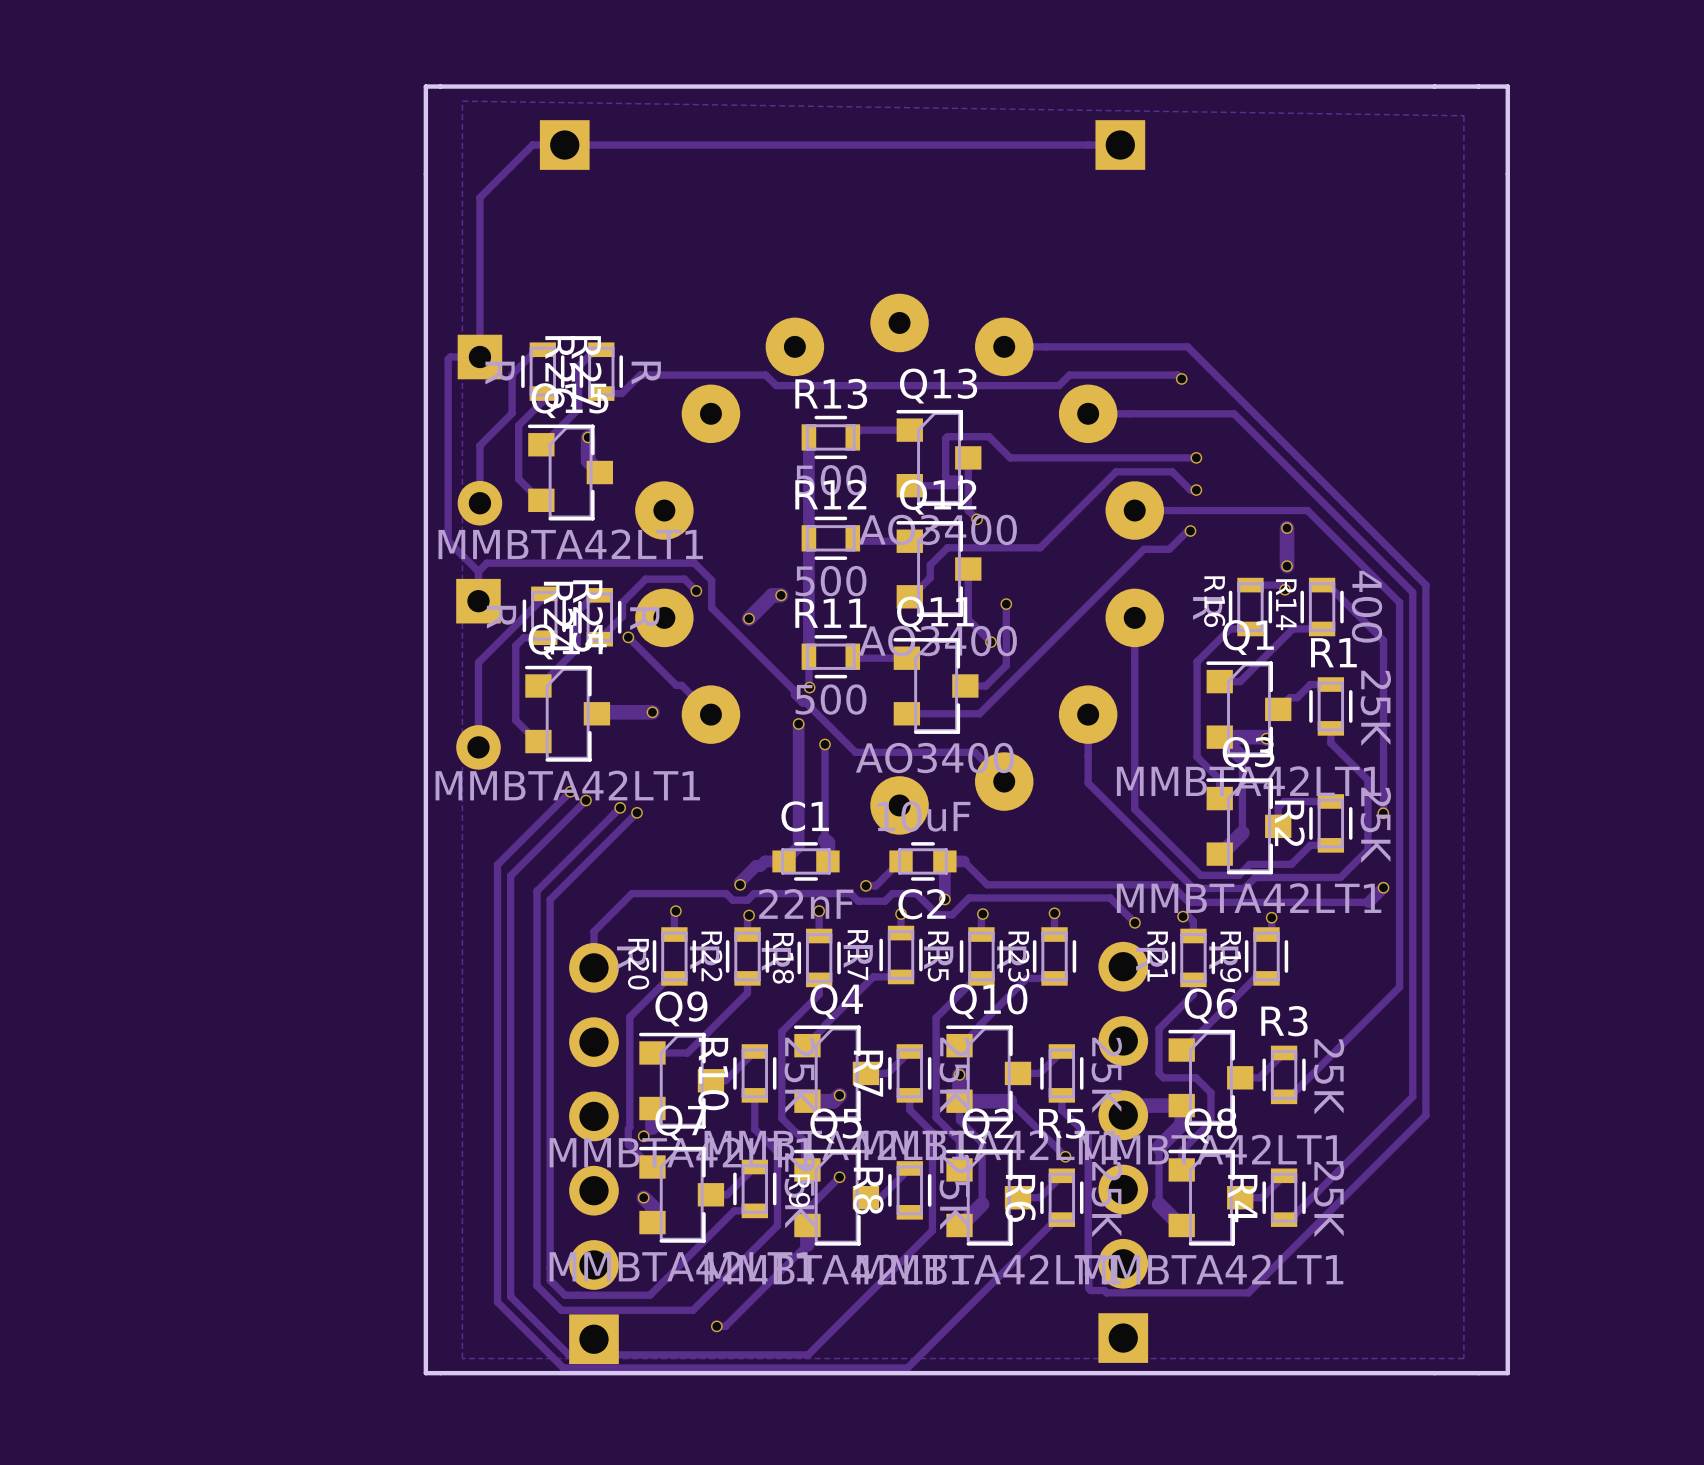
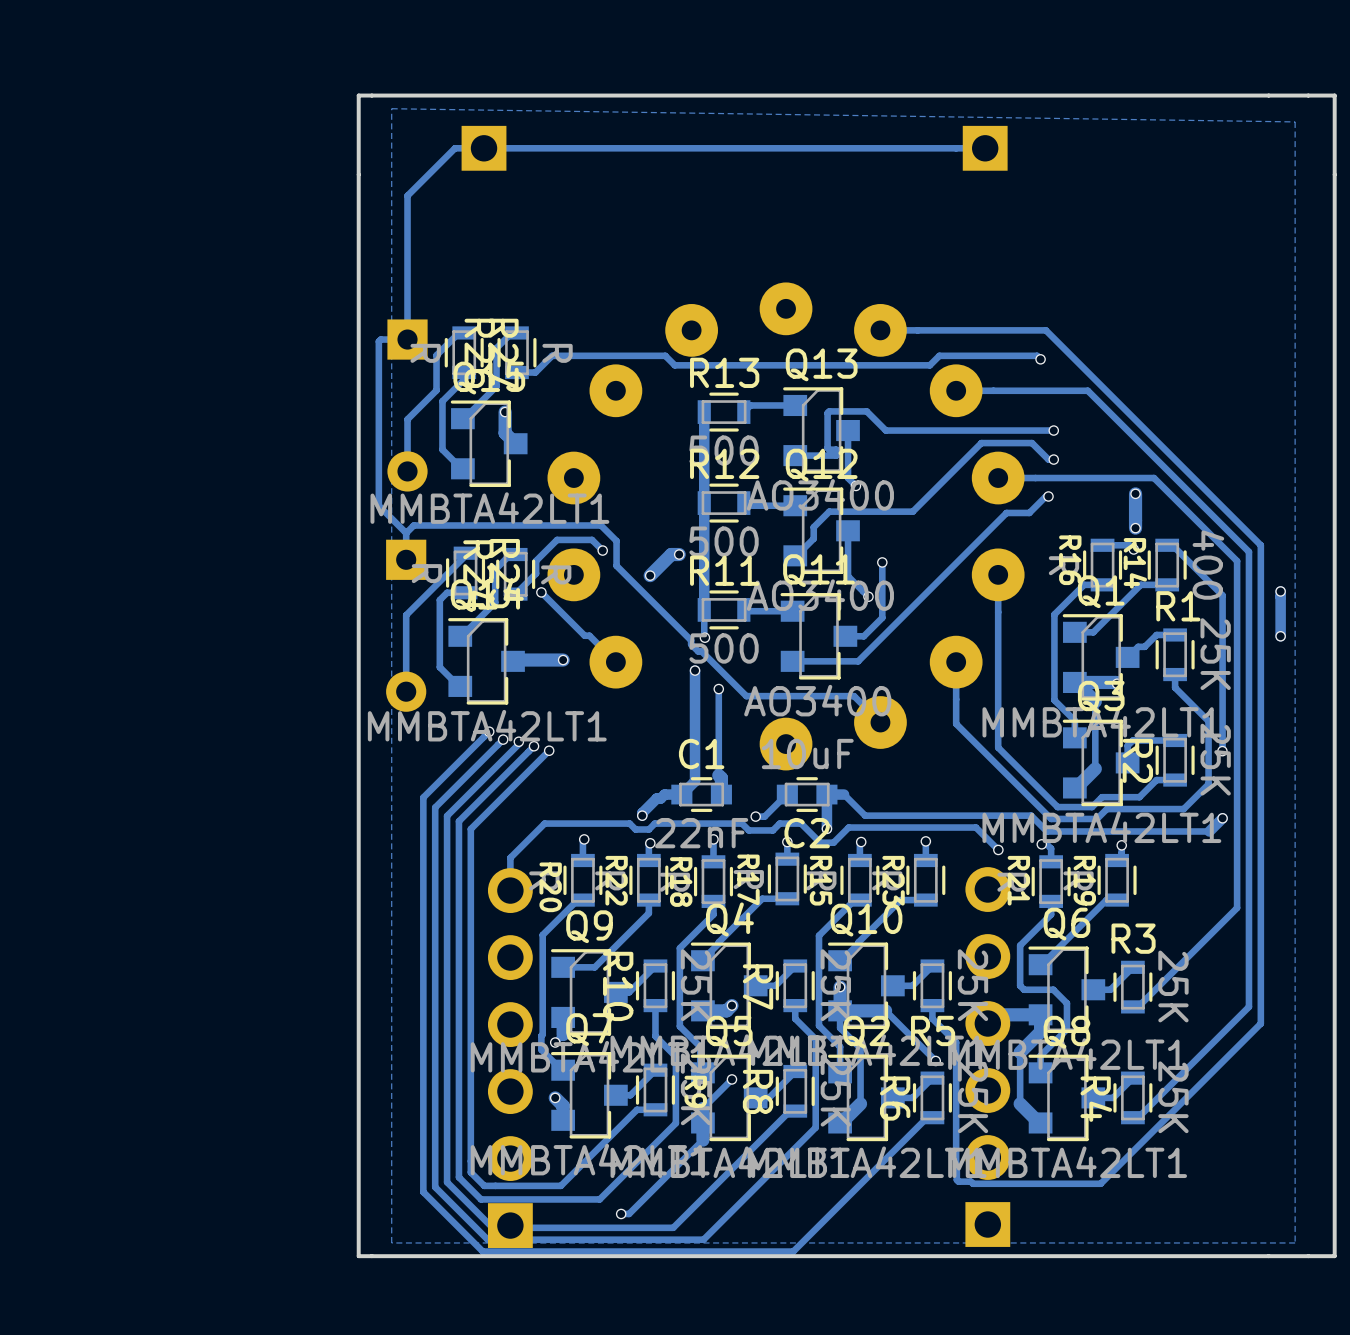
track: none -> (1280, 591) (1280, 636)
via: none -> (1280, 591)
via: none -> (1280, 636)
track: none -> (518, 741) (518, 744) (447, 815) (447, 1182) (492, 1227) (673, 1227) (789, 1111)
via: none -> (518, 741)

